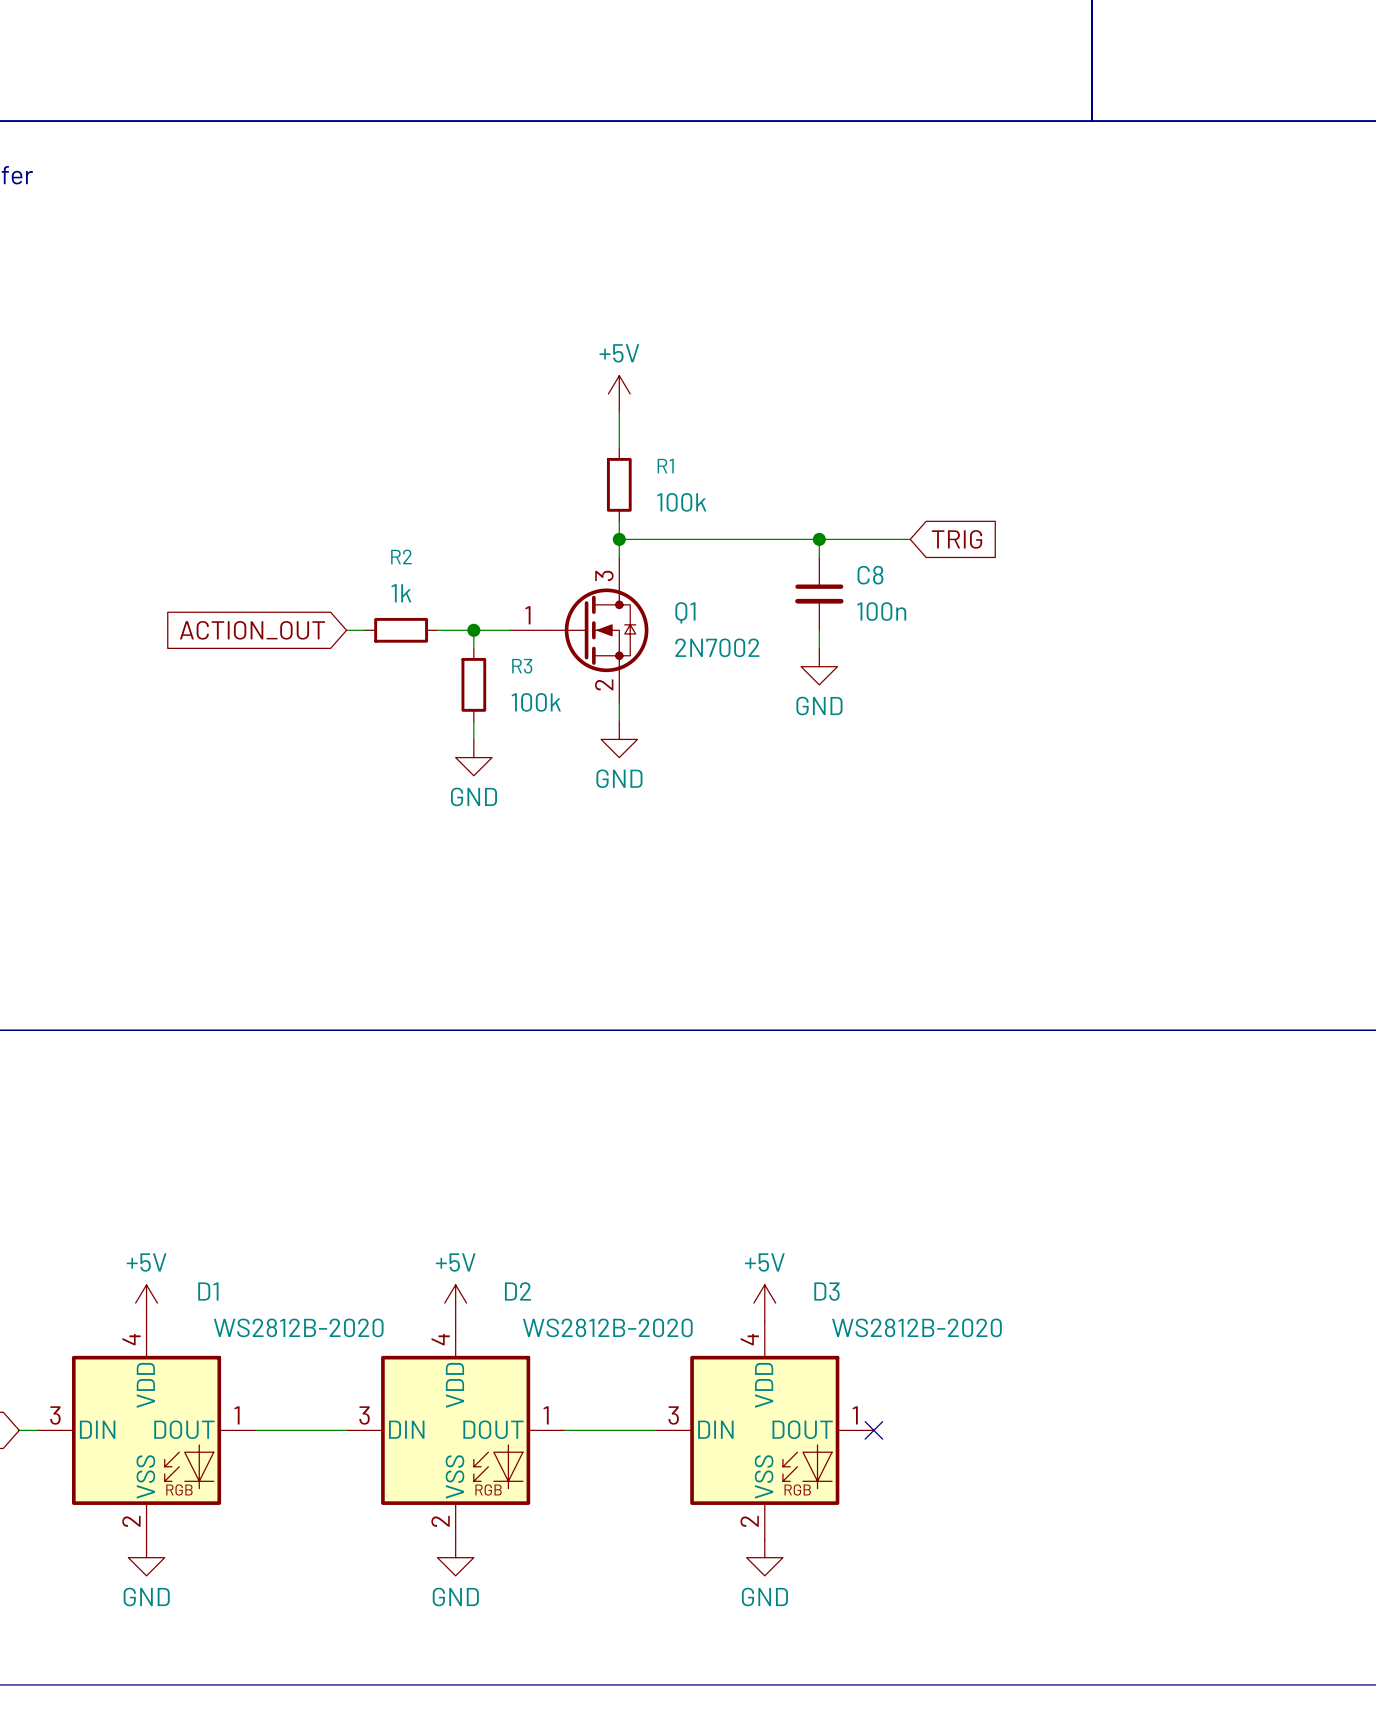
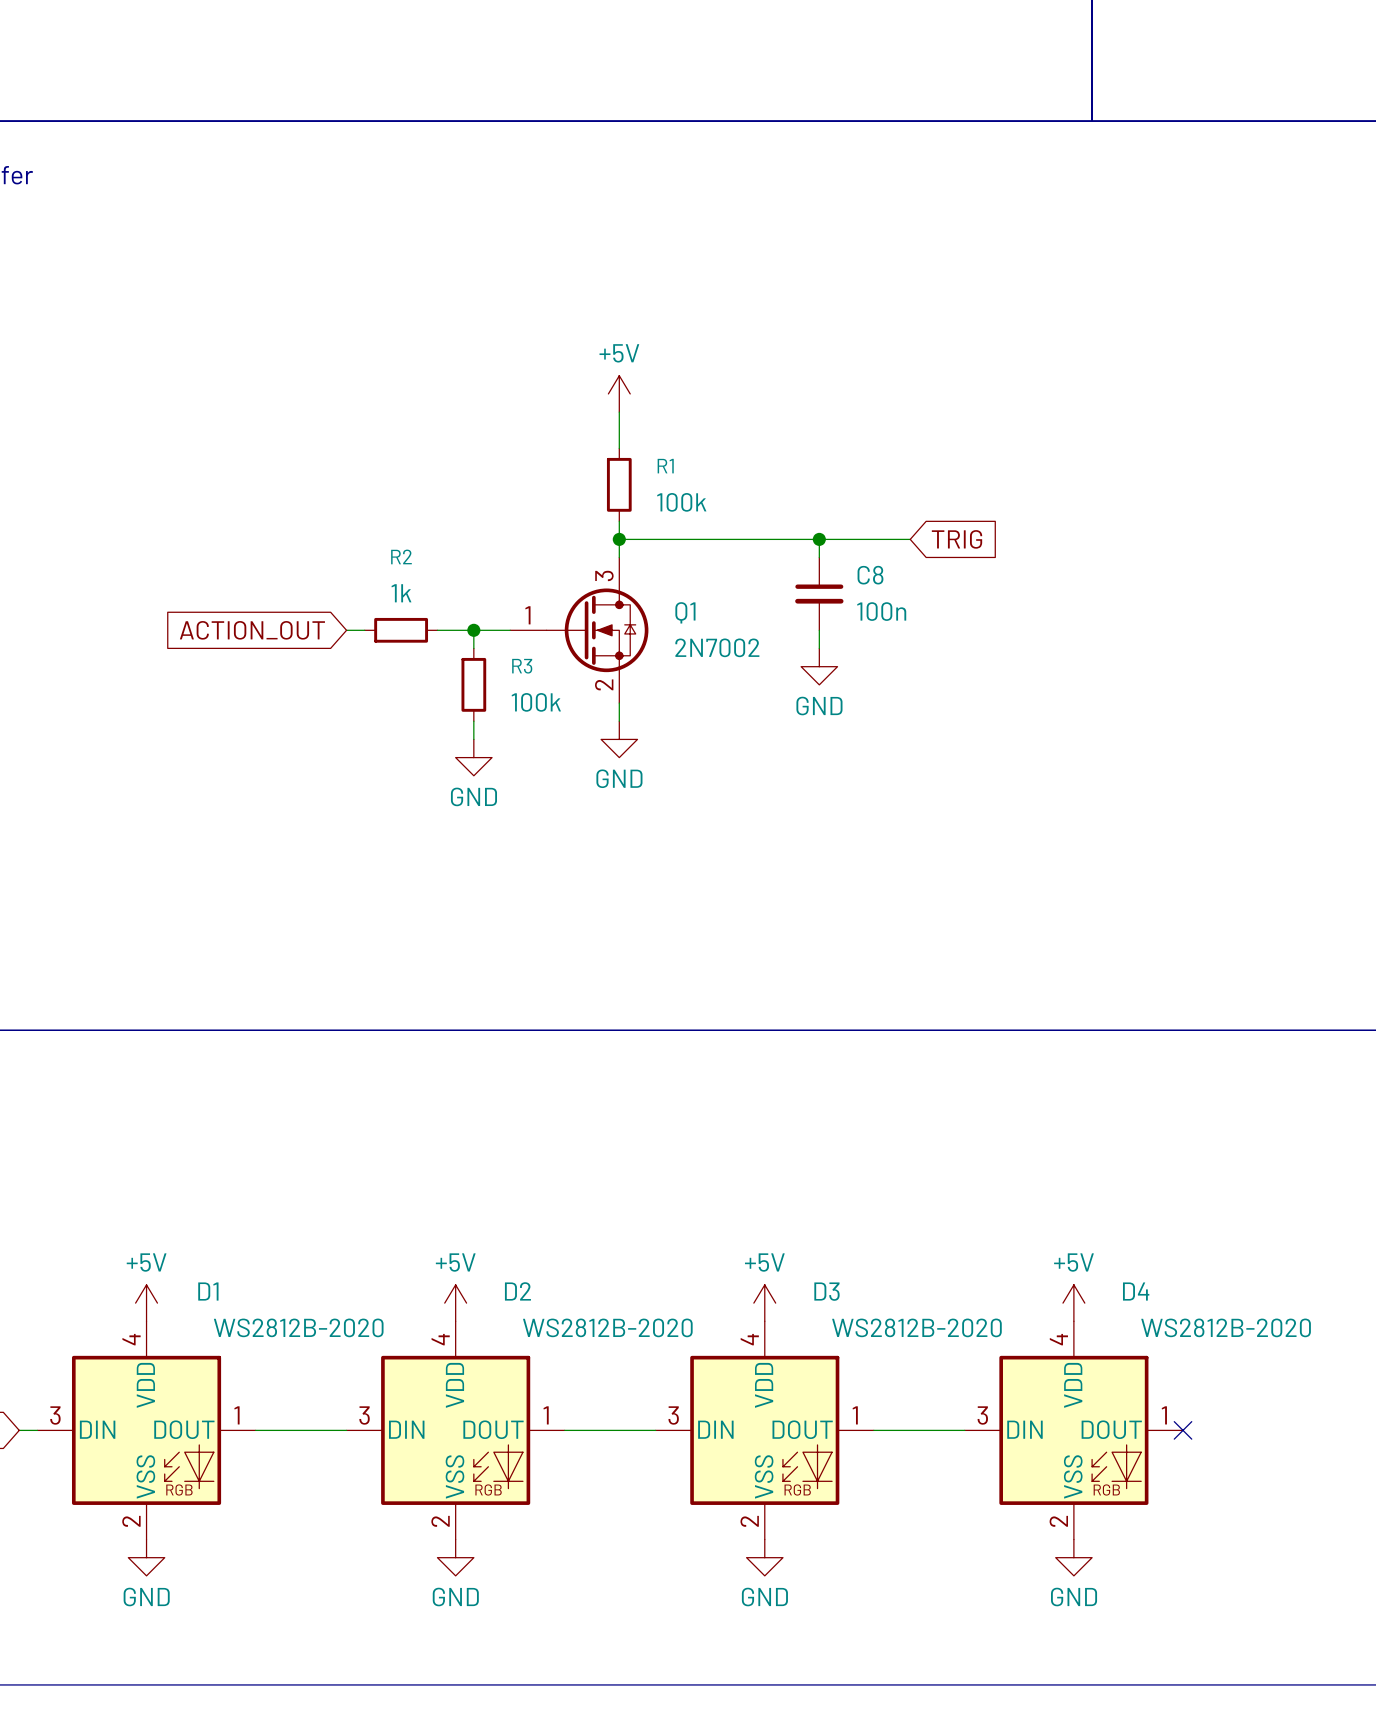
power symbol: none -> +5V (1073, 1303)
wire: none -> (873, 1430) (964, 1430)
no-connect mark: (873, 1430) -> none
D4: none -> WS2812B-2020 (1073, 1430)
no-connect mark: none -> (1183, 1430)
power symbol: none -> GND (1073, 1557)

